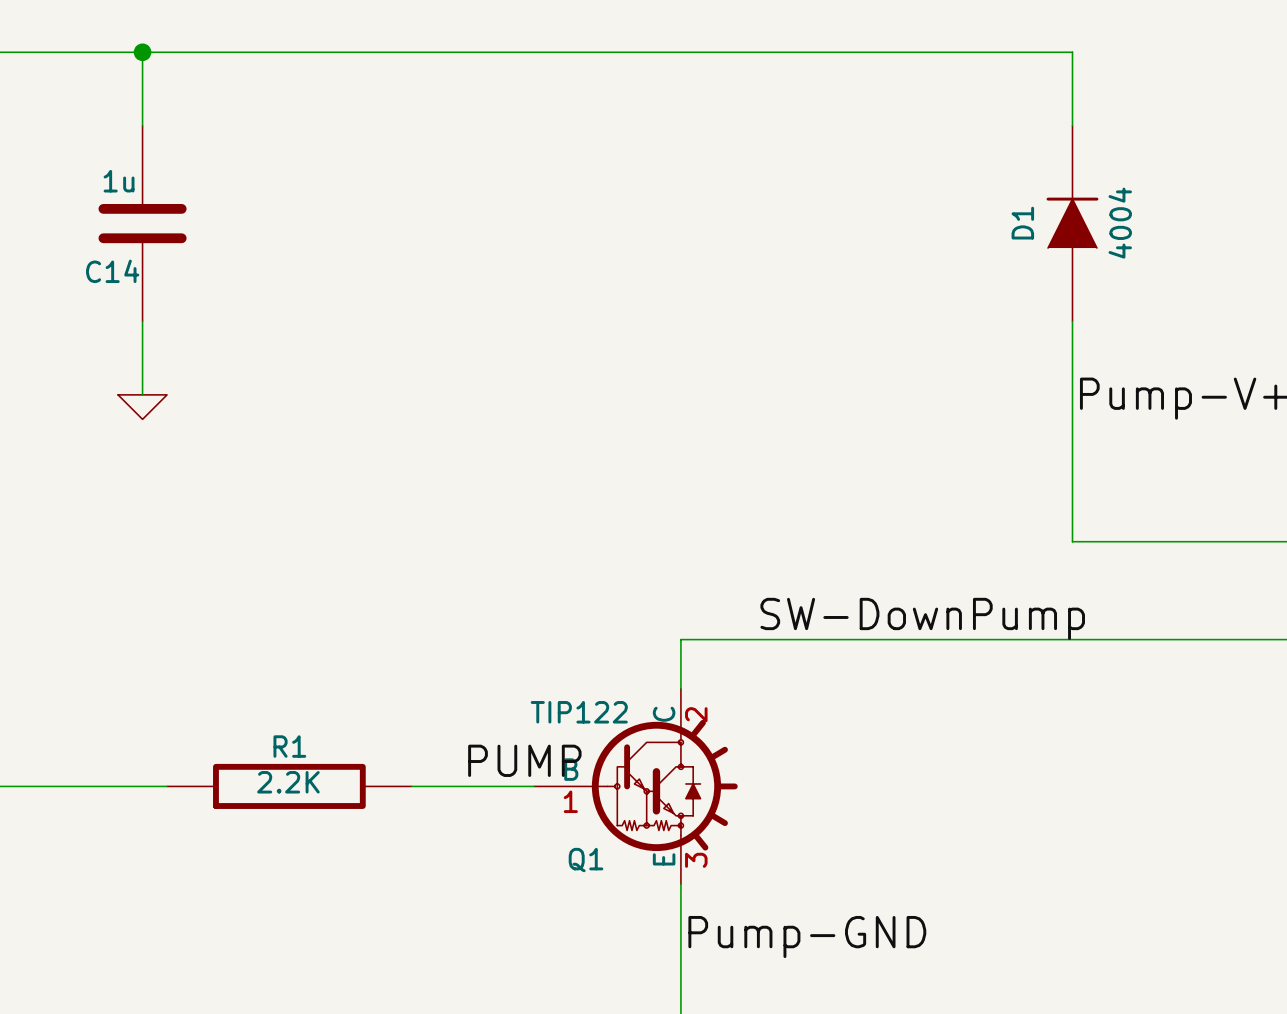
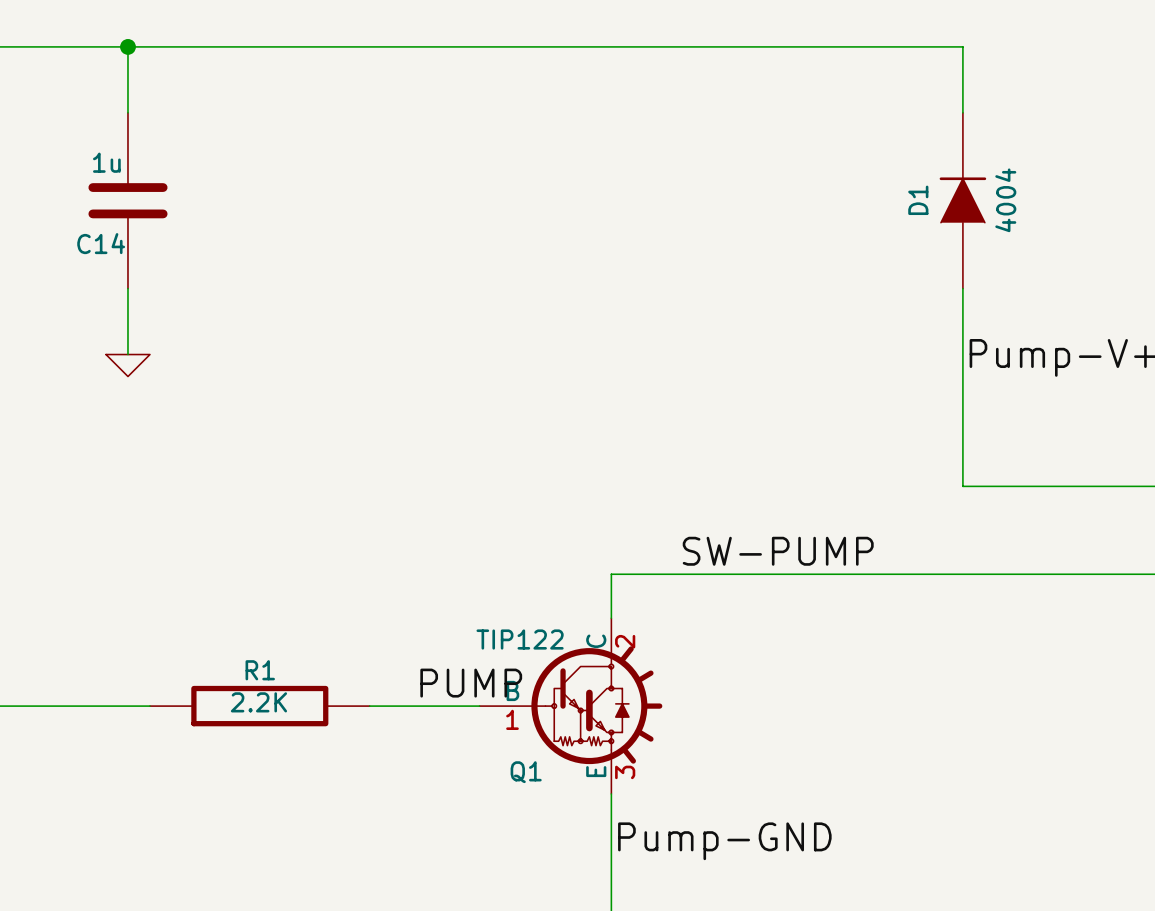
label: SW-DownPump (922, 618) -> SW-PUMP (778, 551)

